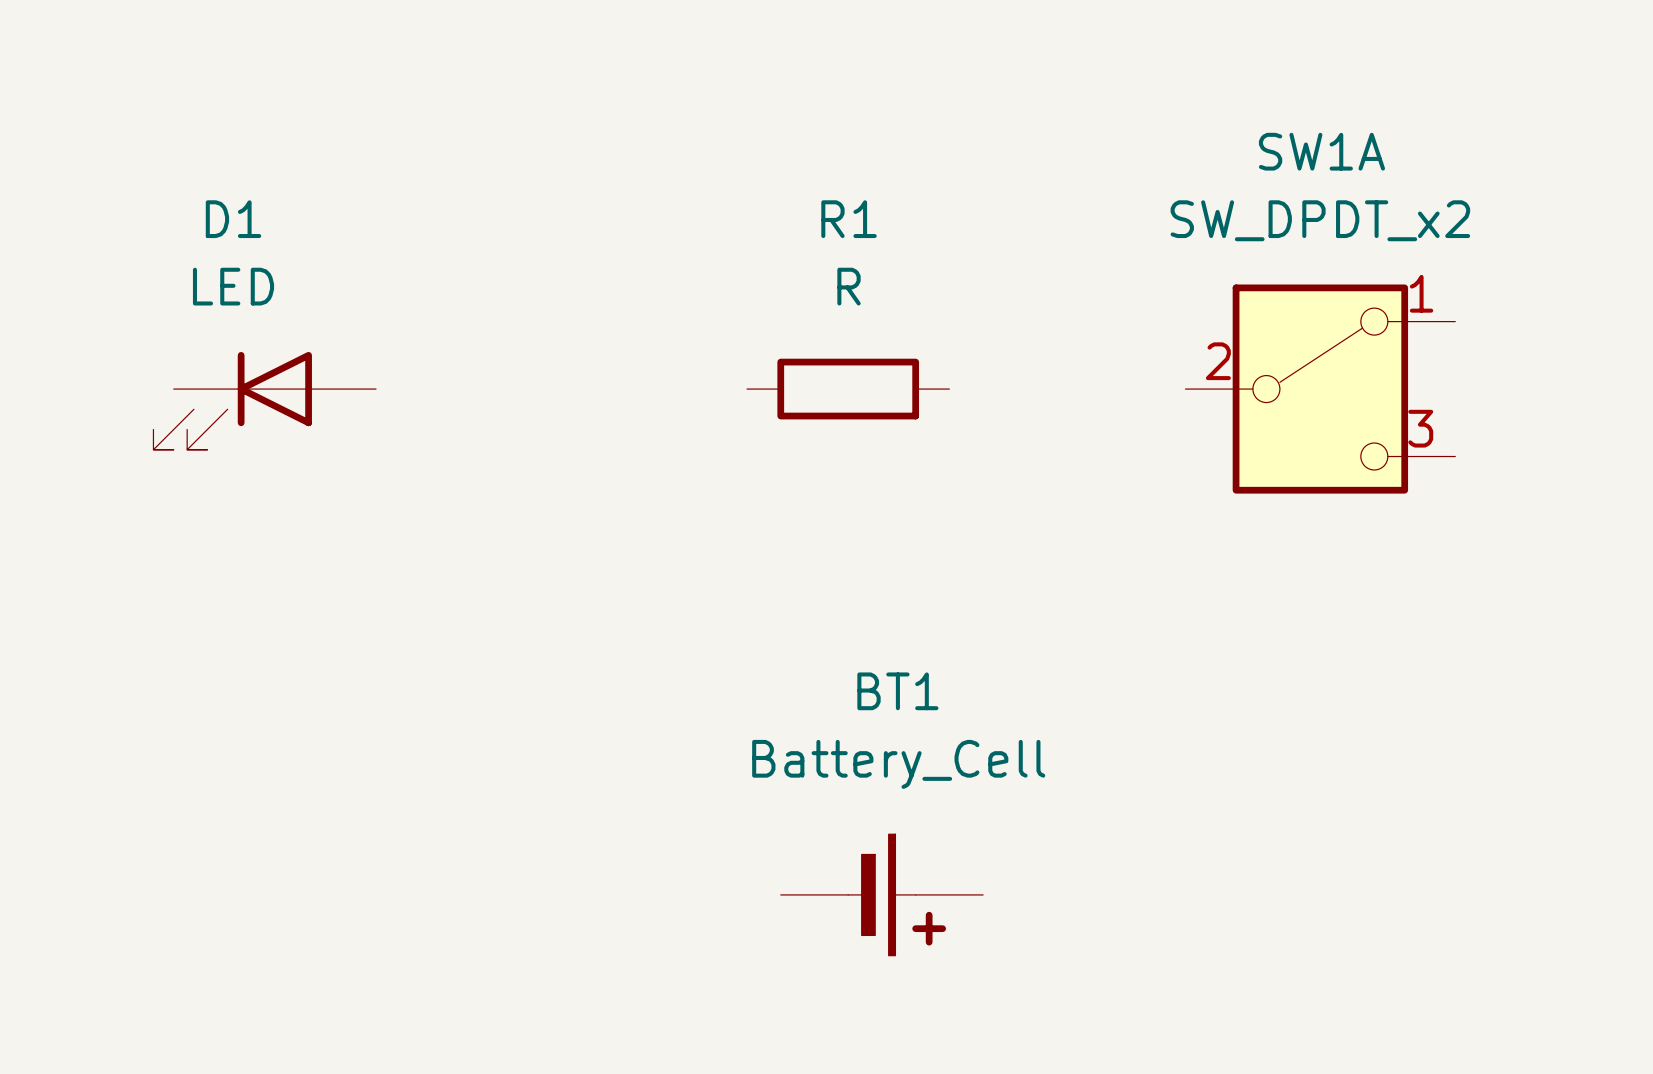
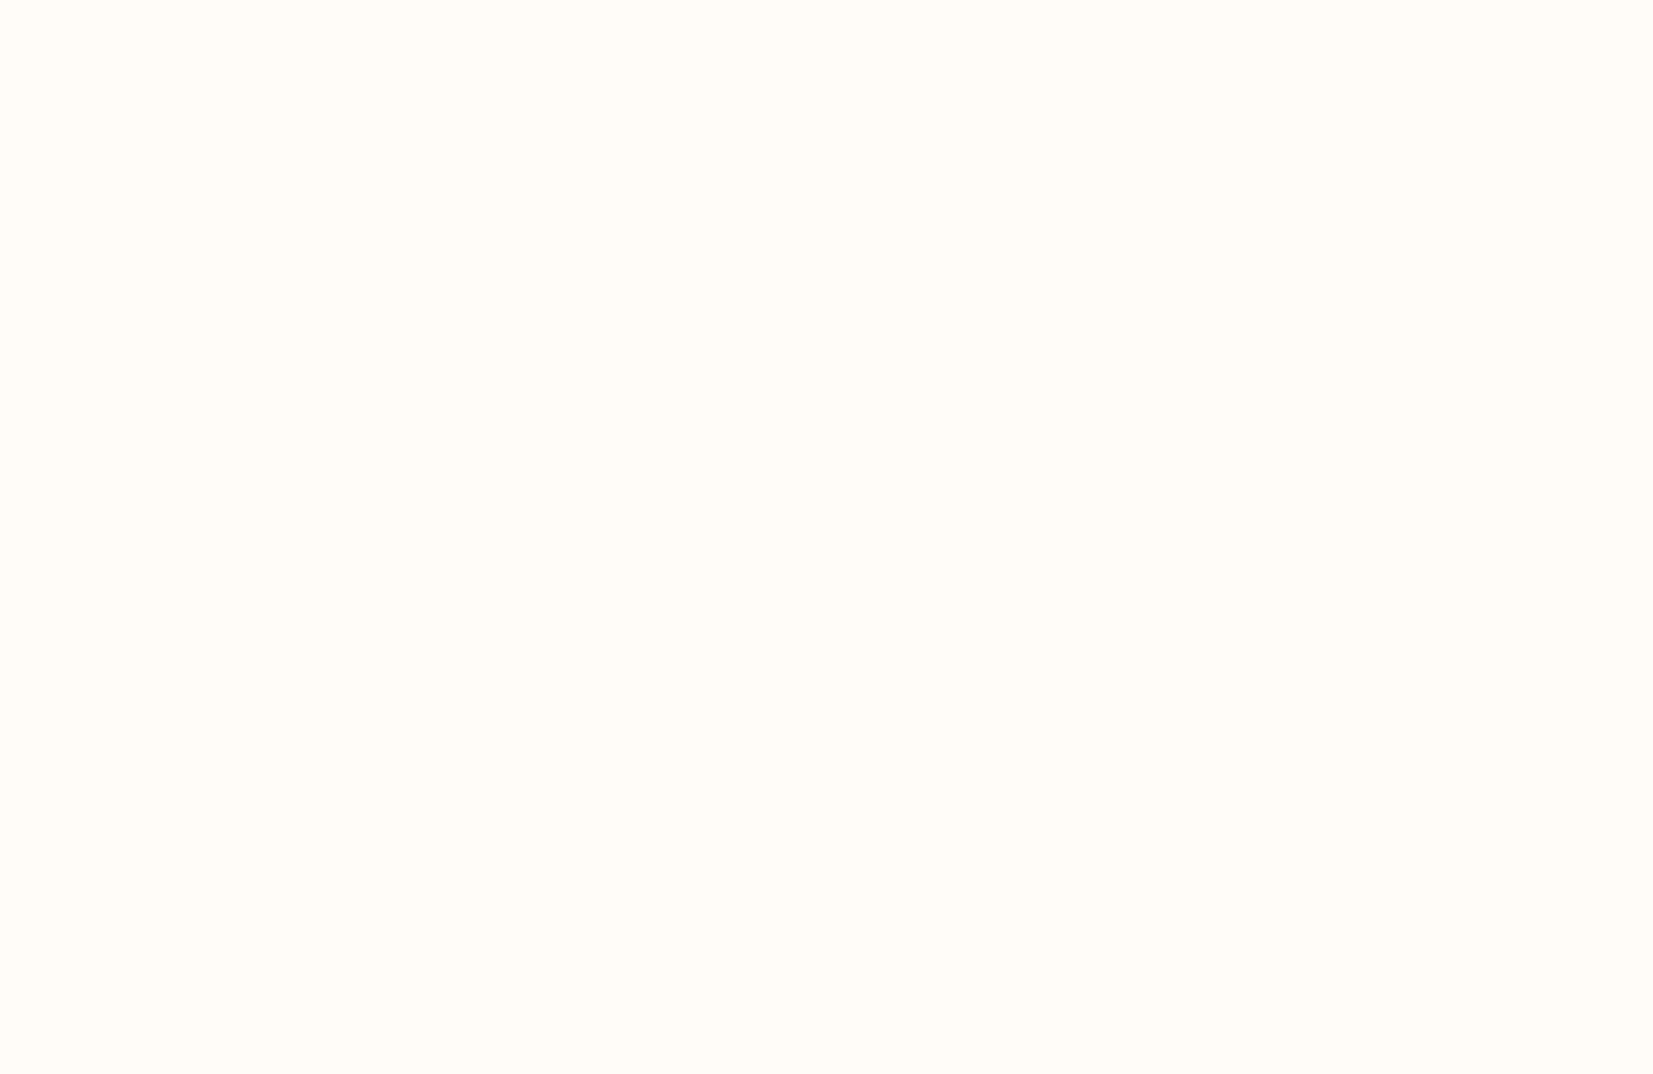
R1: R (848, 389) -> none
SW1A: SW_DPDT_x2 (1320, 389) -> none
D1: LED (264, 400) -> none
BT1: Battery_Cell (881, 894) -> none

